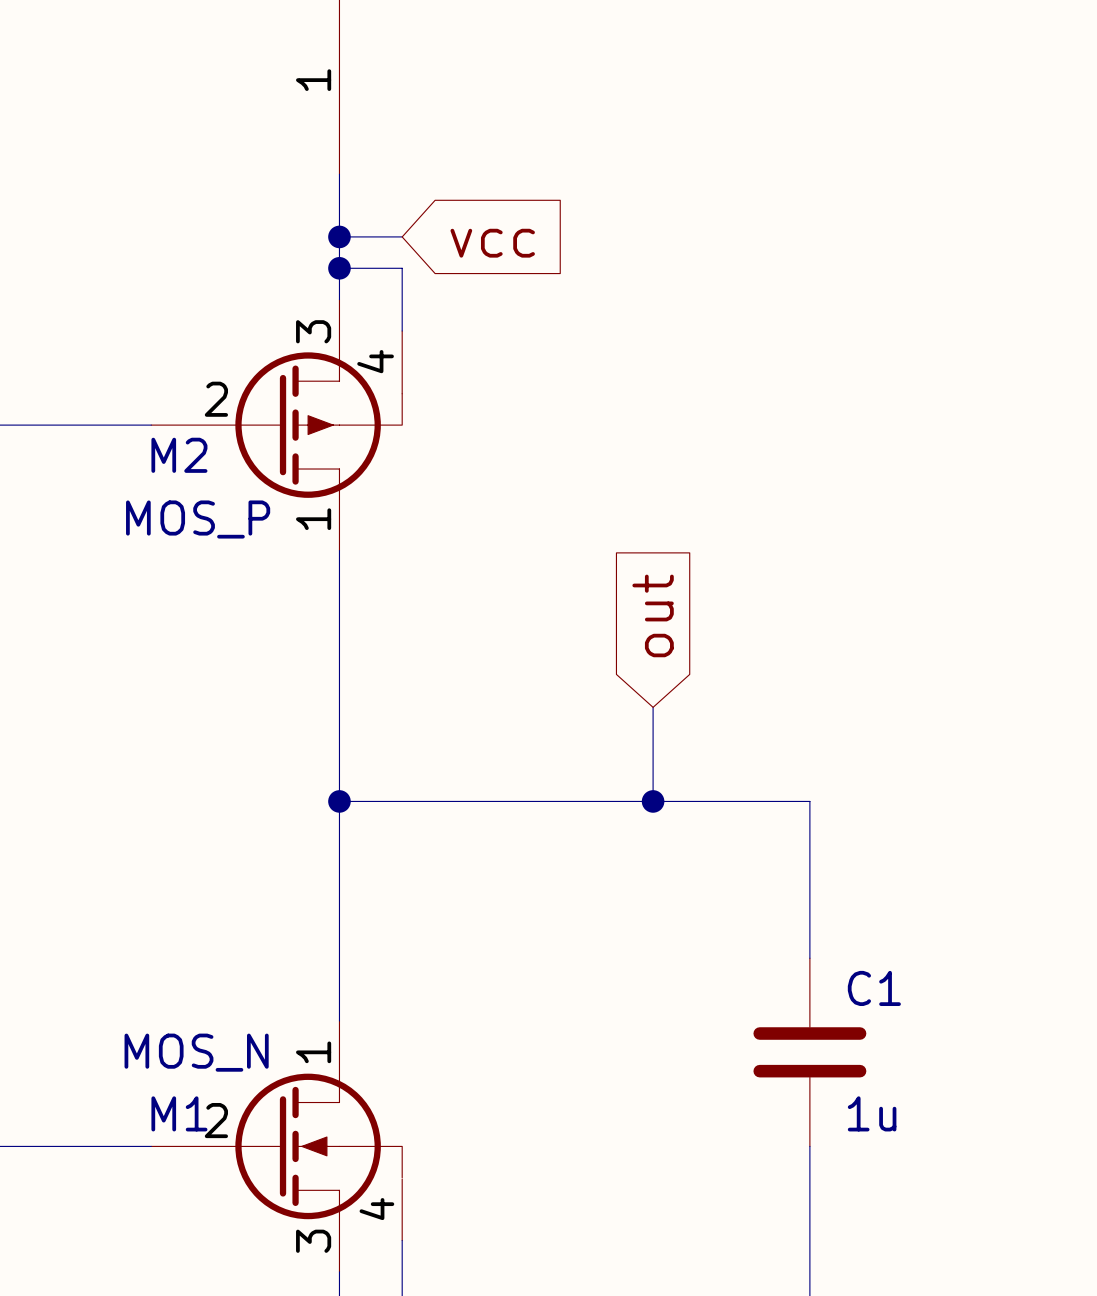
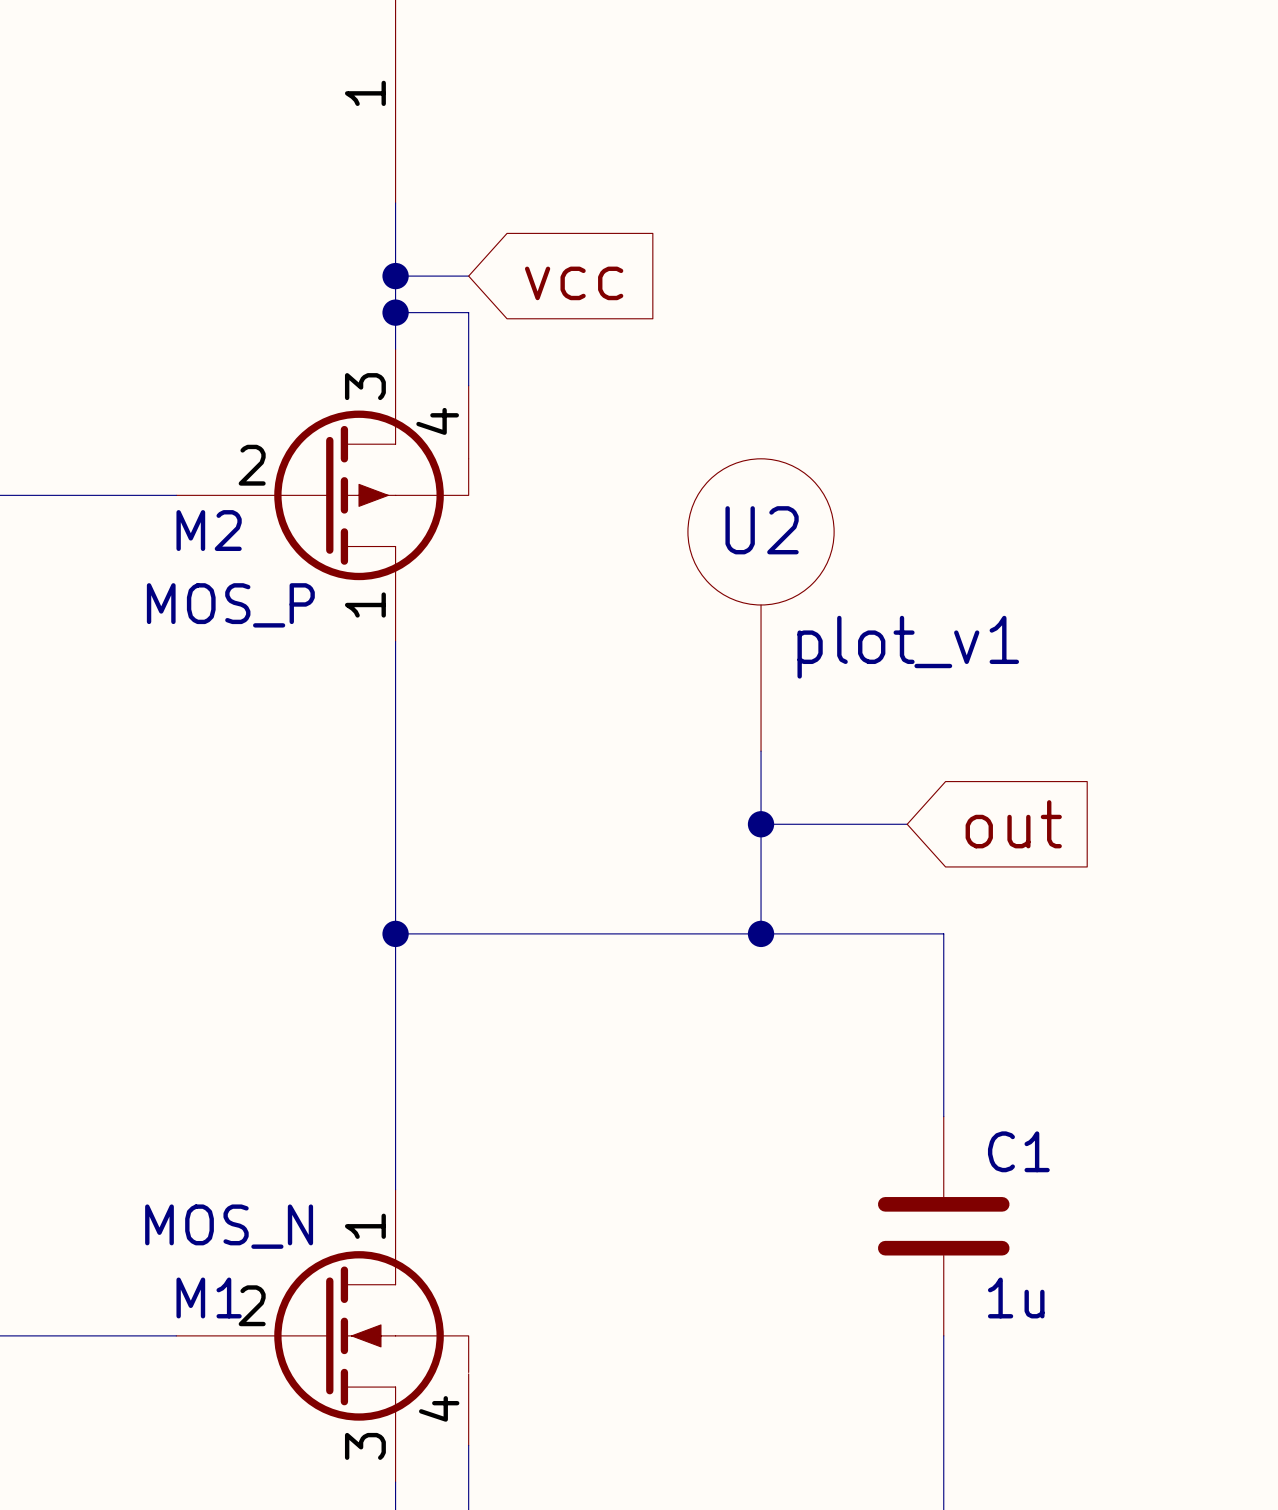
U2: none -> plot_v1 (761, 604)
global label rotation: 0° (653, 615) -> 90° clockwise (1013, 824)
global label position: out (653, 615) -> out (1013, 824)
wire: none -> (761, 751) (761, 824) (907, 824)
junction: none -> (761, 824)

